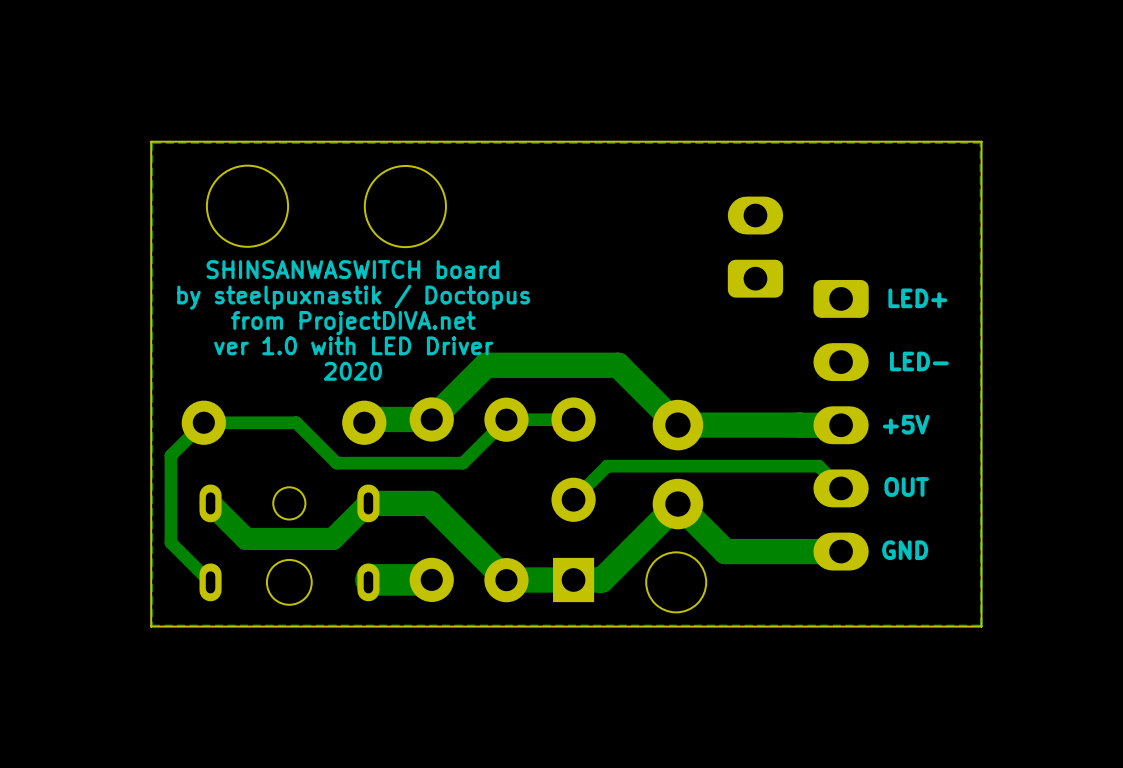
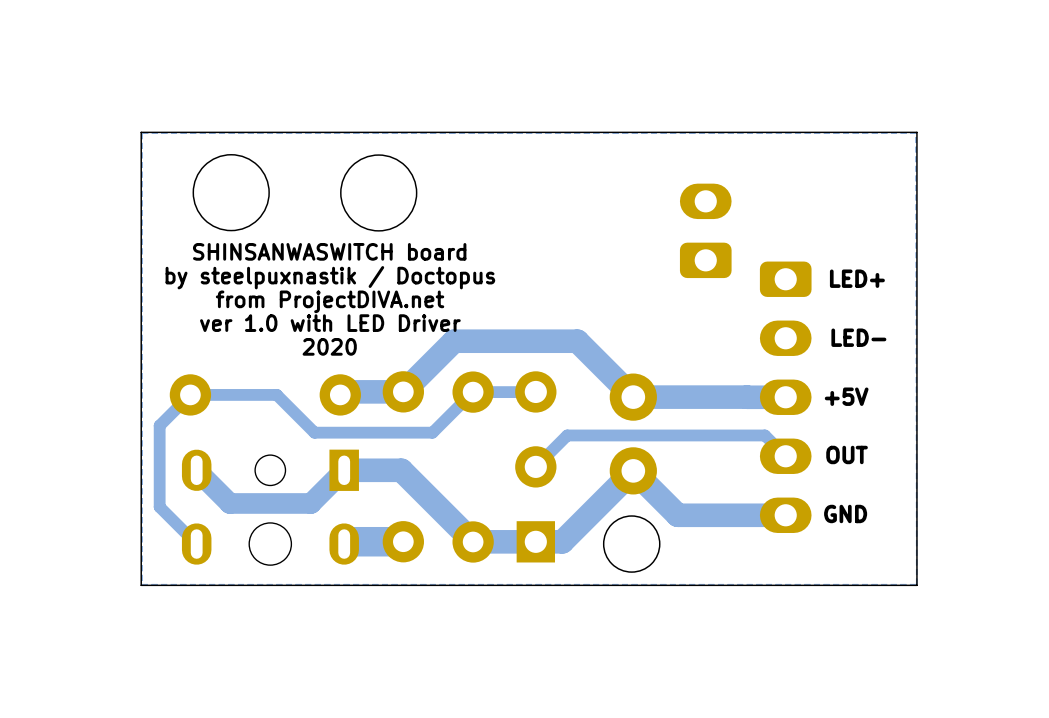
part footprint: [199, 484, 380, 605] -> [181, 449, 359, 566]

